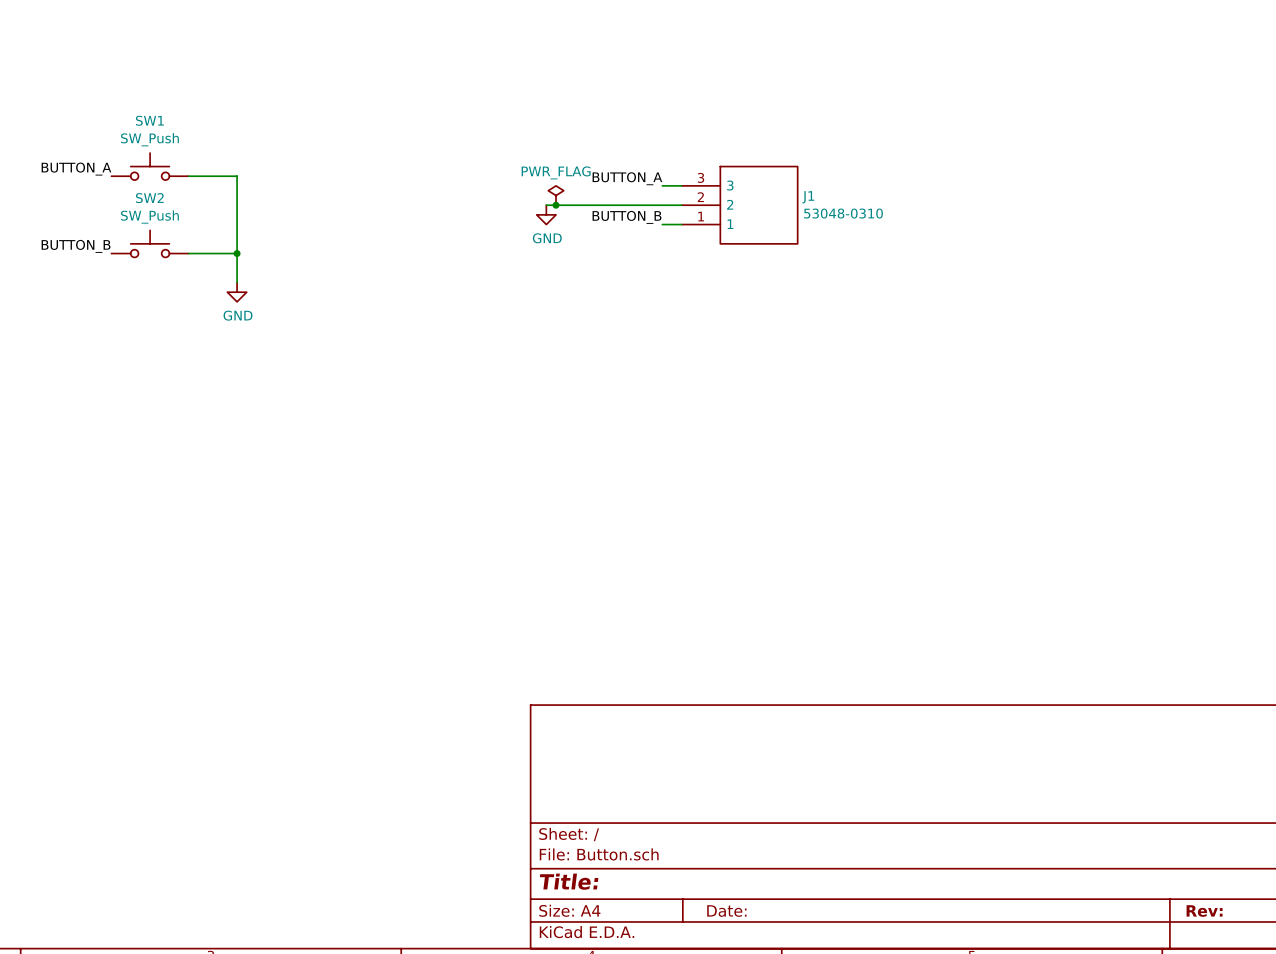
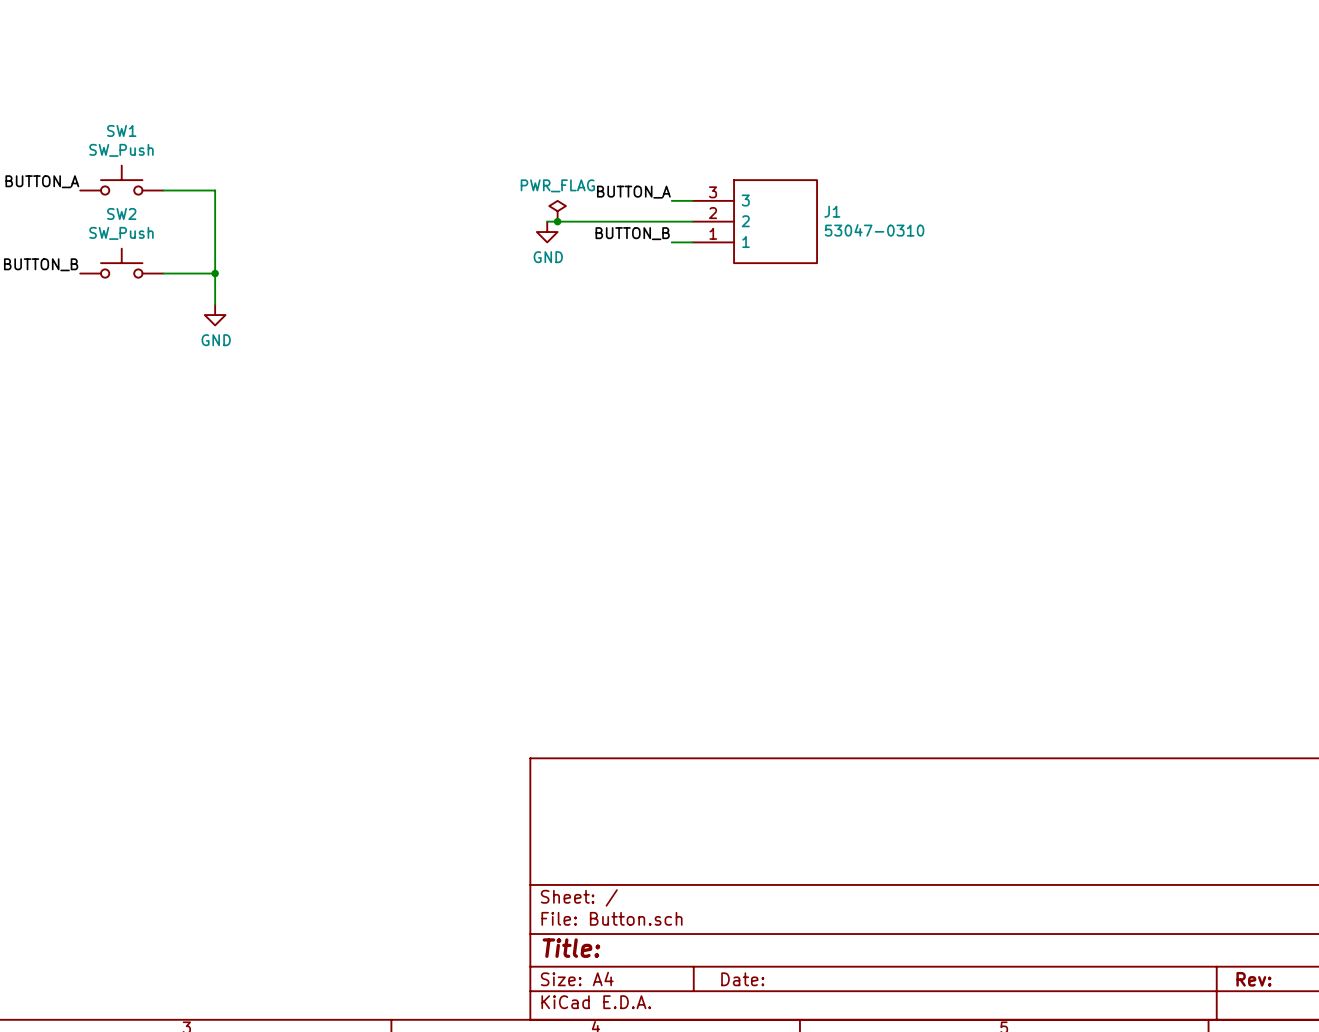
J1 value: 53048-0310 (843, 213) -> 53047-0310 (874, 230)

